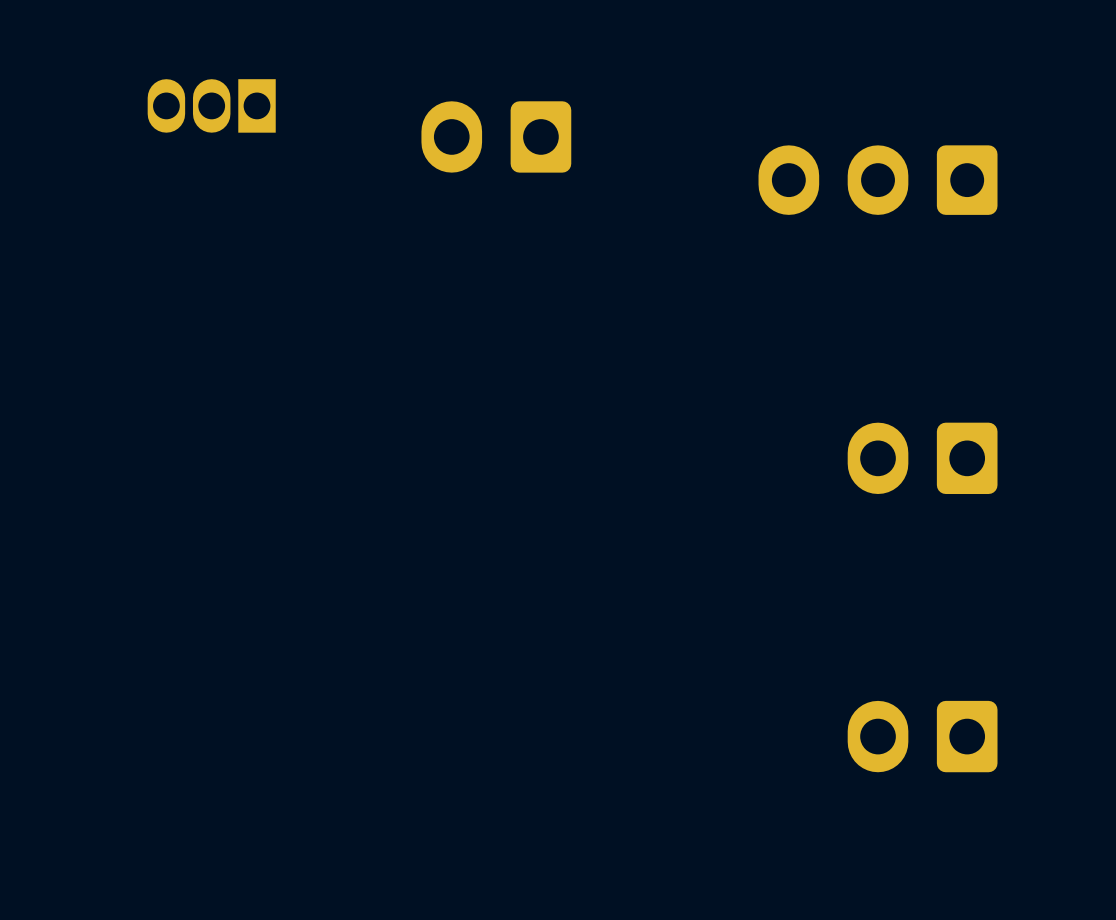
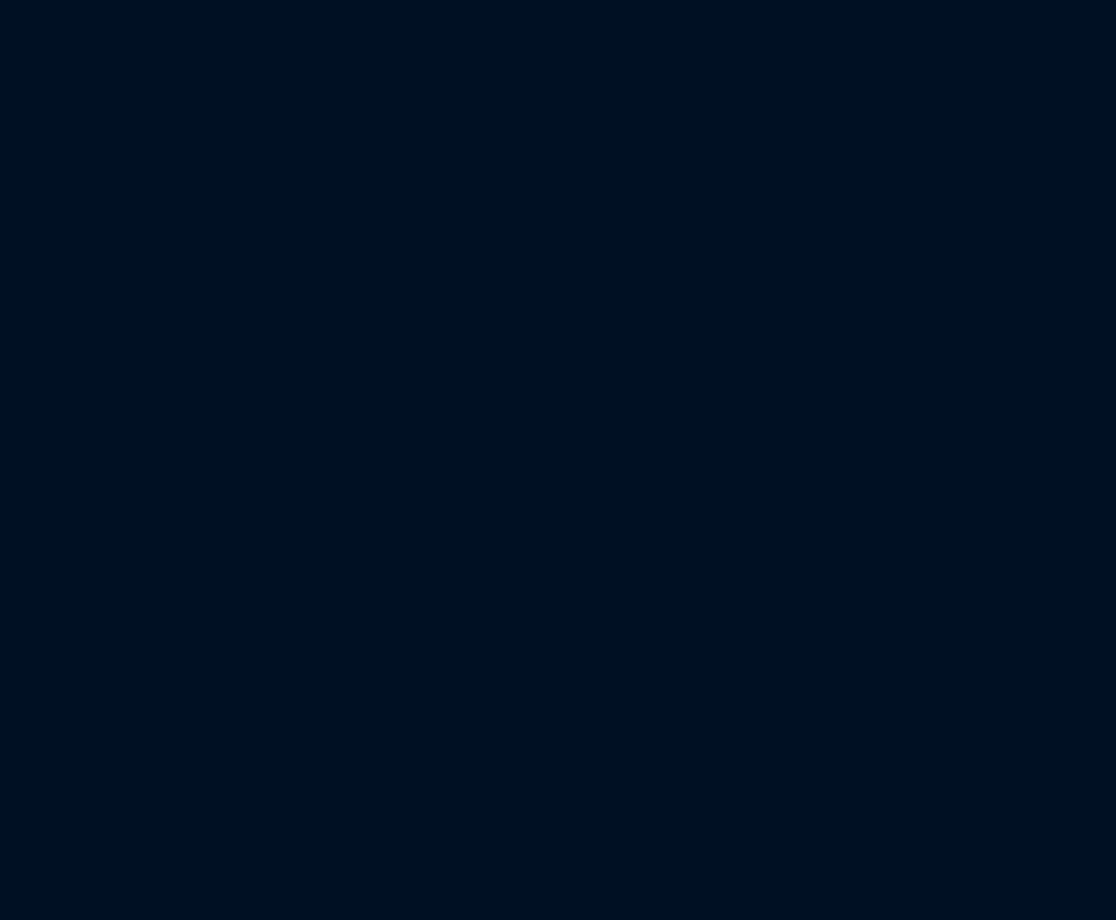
part: (211, 105) -> none
part: (496, 136) -> none
part: (878, 180) -> none
part: (922, 458) -> none
part: (922, 736) -> none

